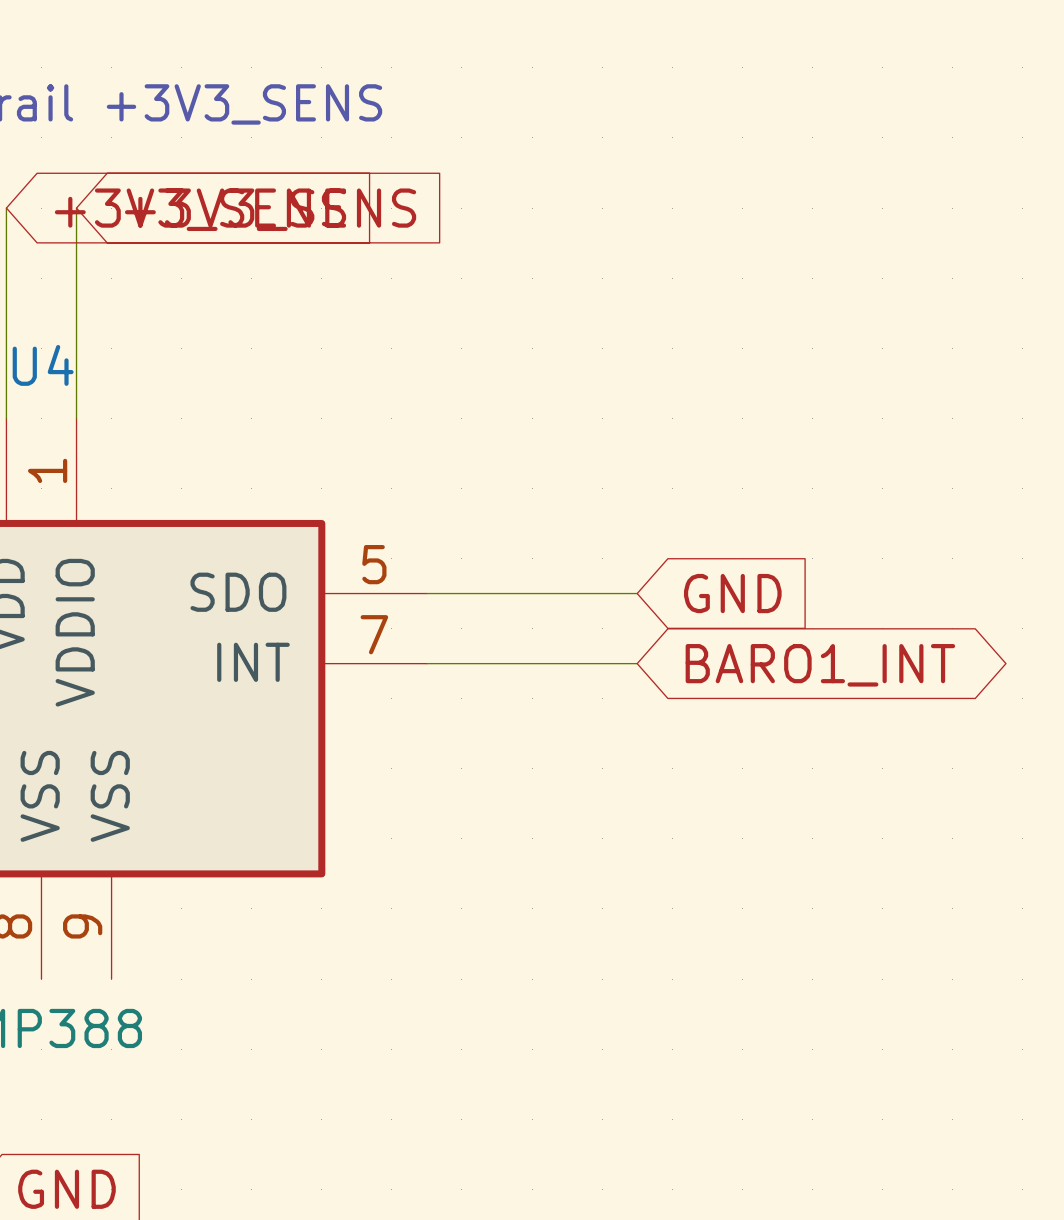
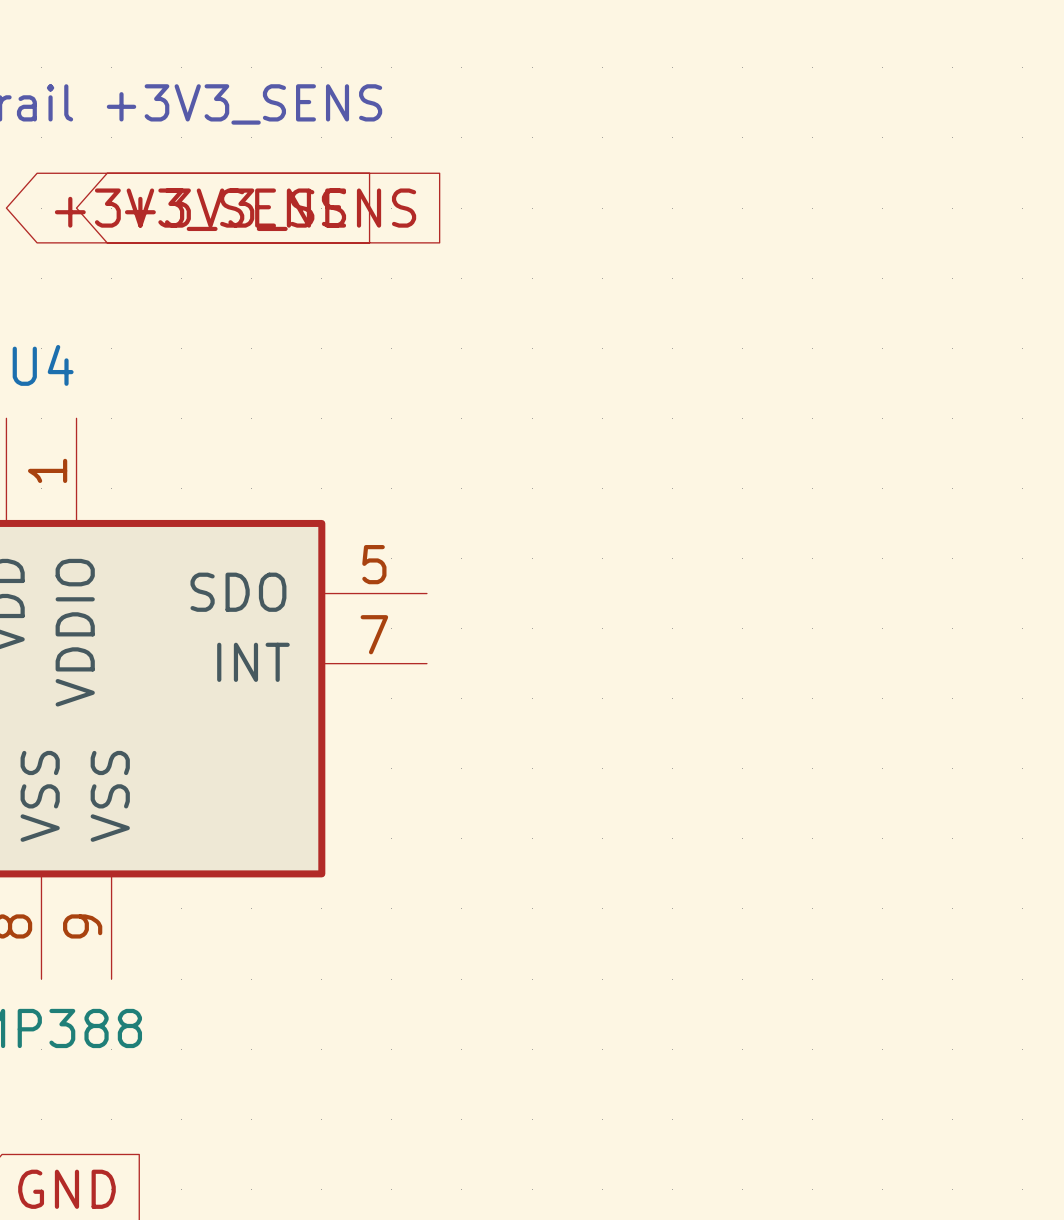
wire: (6, 208) (6, 418) -> none
wire: (76, 208) (76, 418) -> none
wire: (426, 593) (637, 593) -> none
global label: GND (732, 593) -> none
wire: (426, 663) (637, 663) -> none
global label: BARO1_INT (820, 665) -> none

